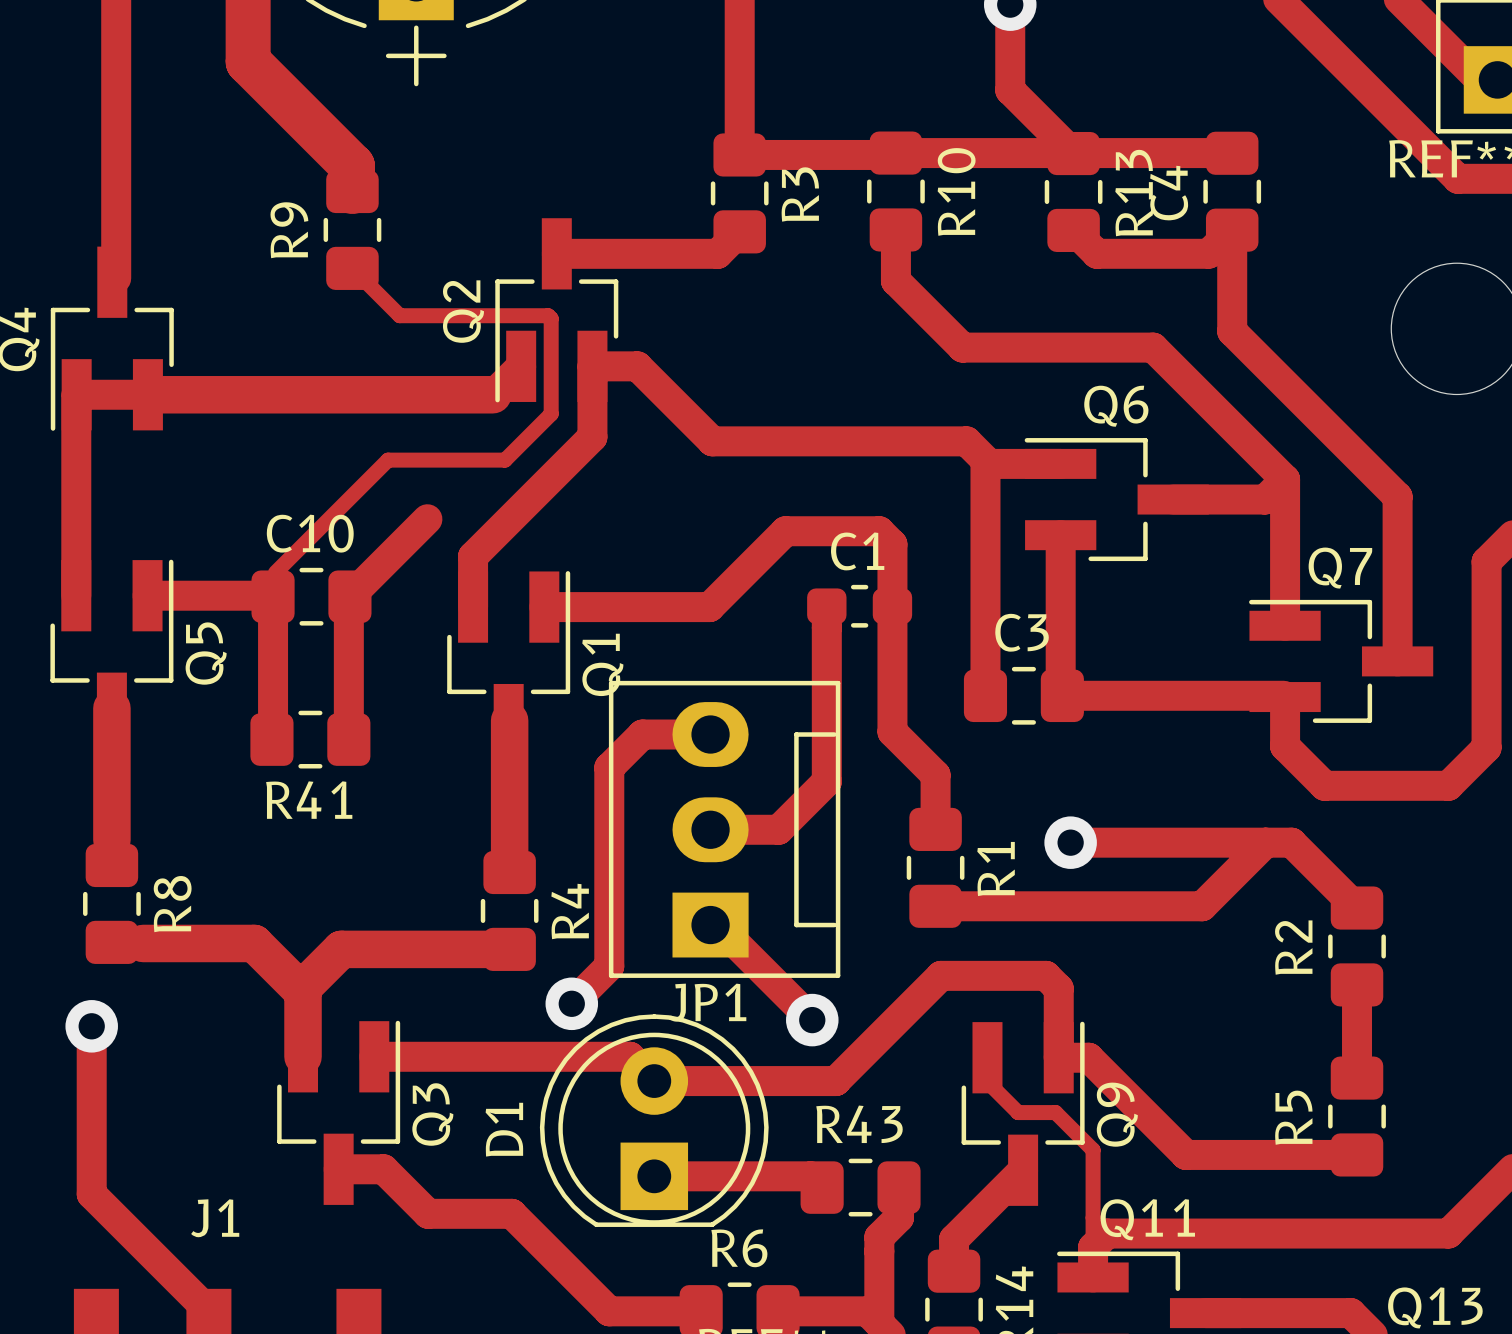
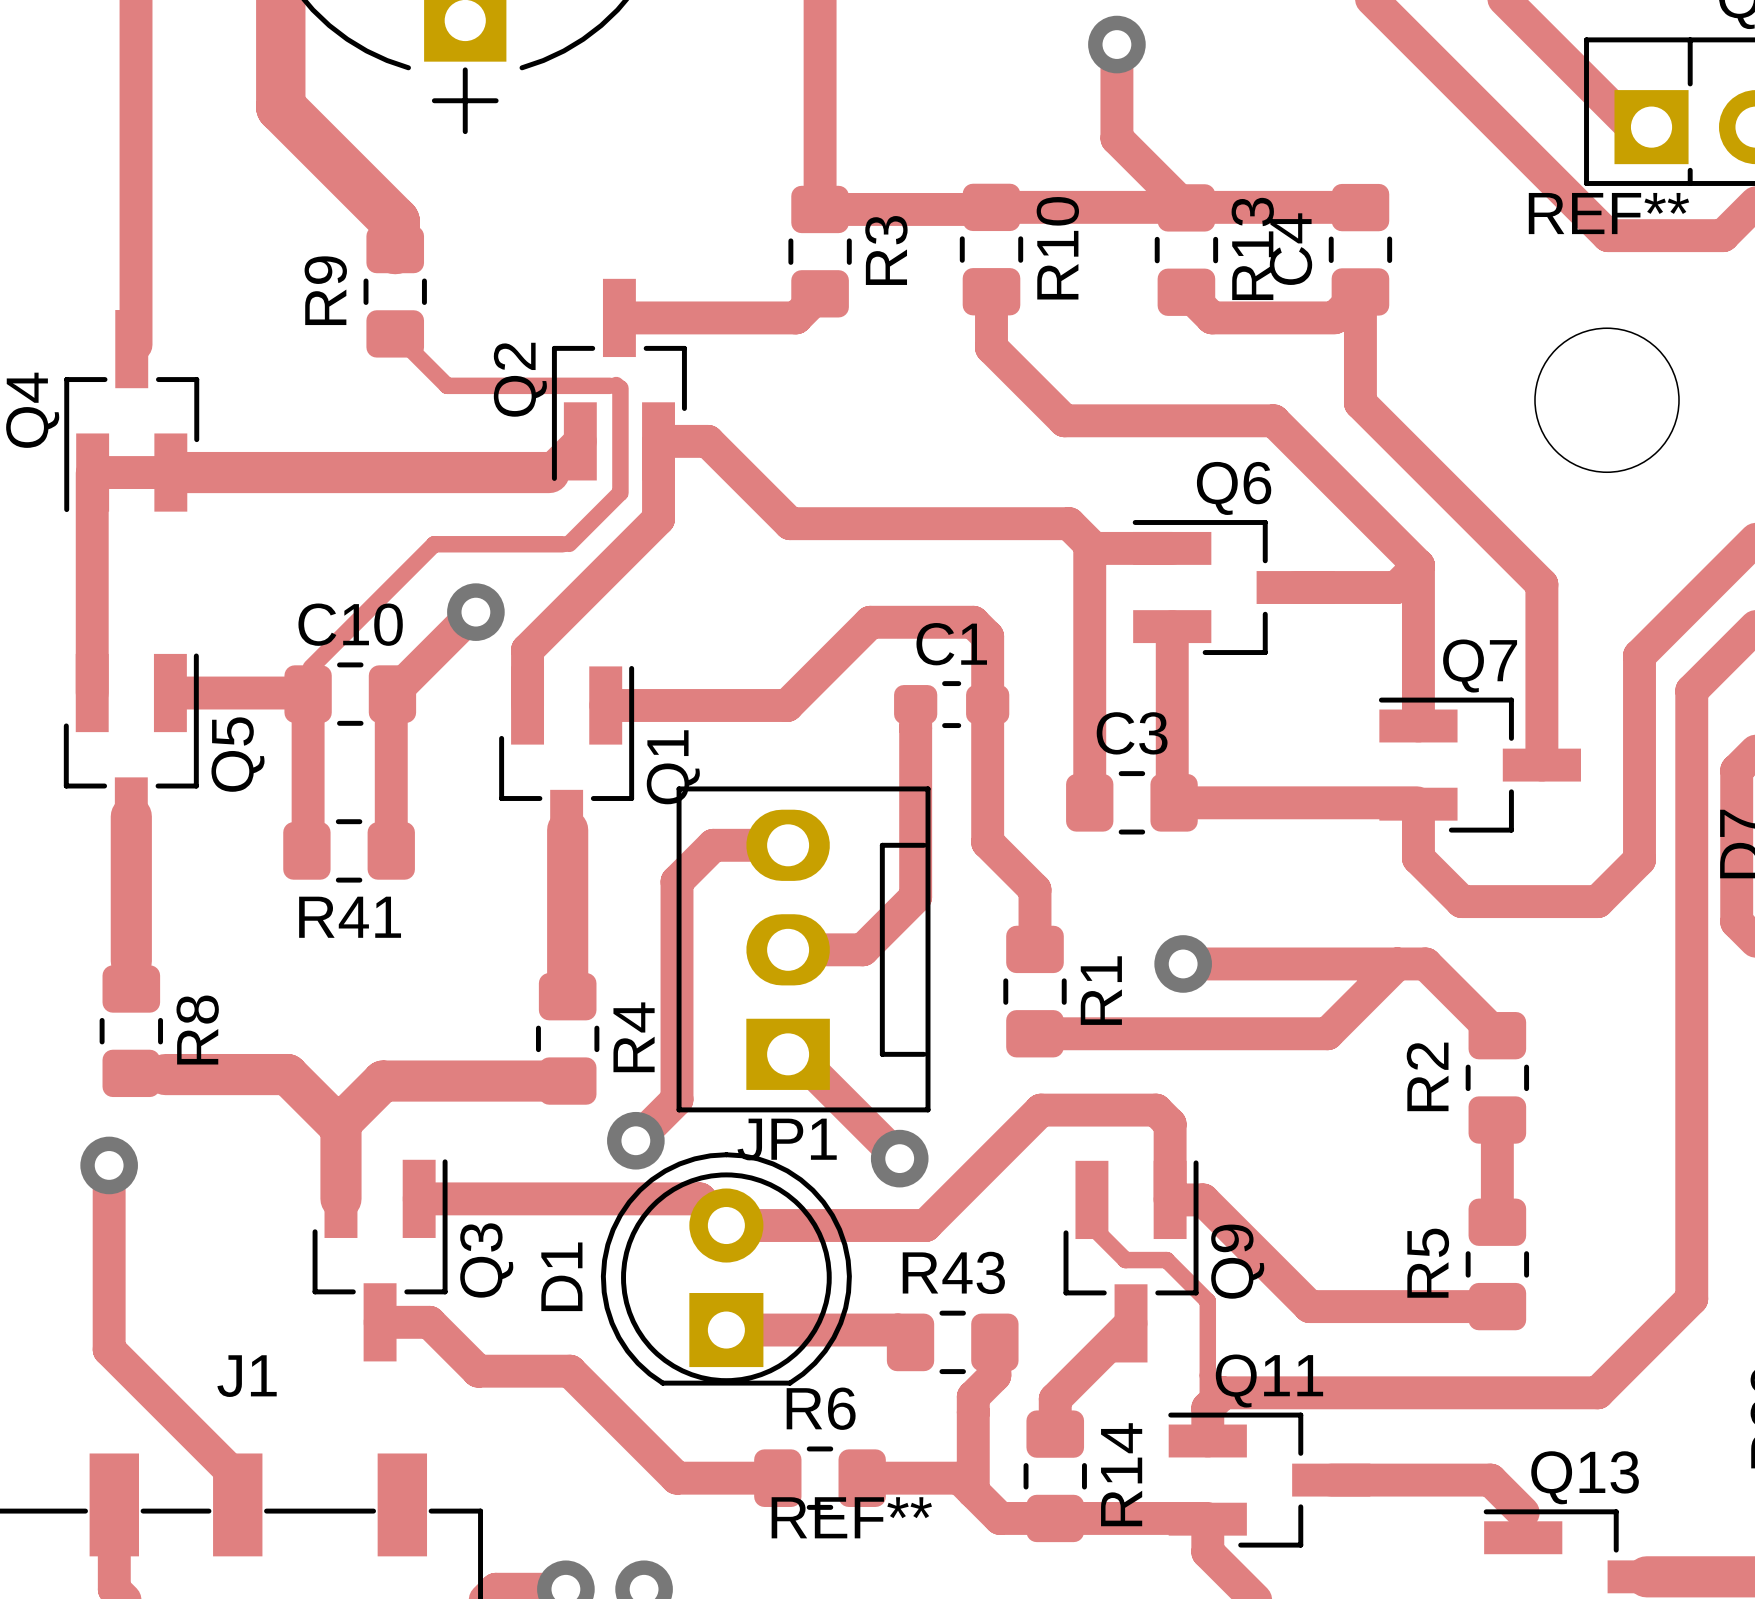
track: (548, 315) (551, 318) (551, 413) (505, 460) -> none
track: none -> (619, 388) (616, 385) (620, 388) (620, 492)
track: none -> (619, 493) (569, 543)
via: none -> (475, 612)

